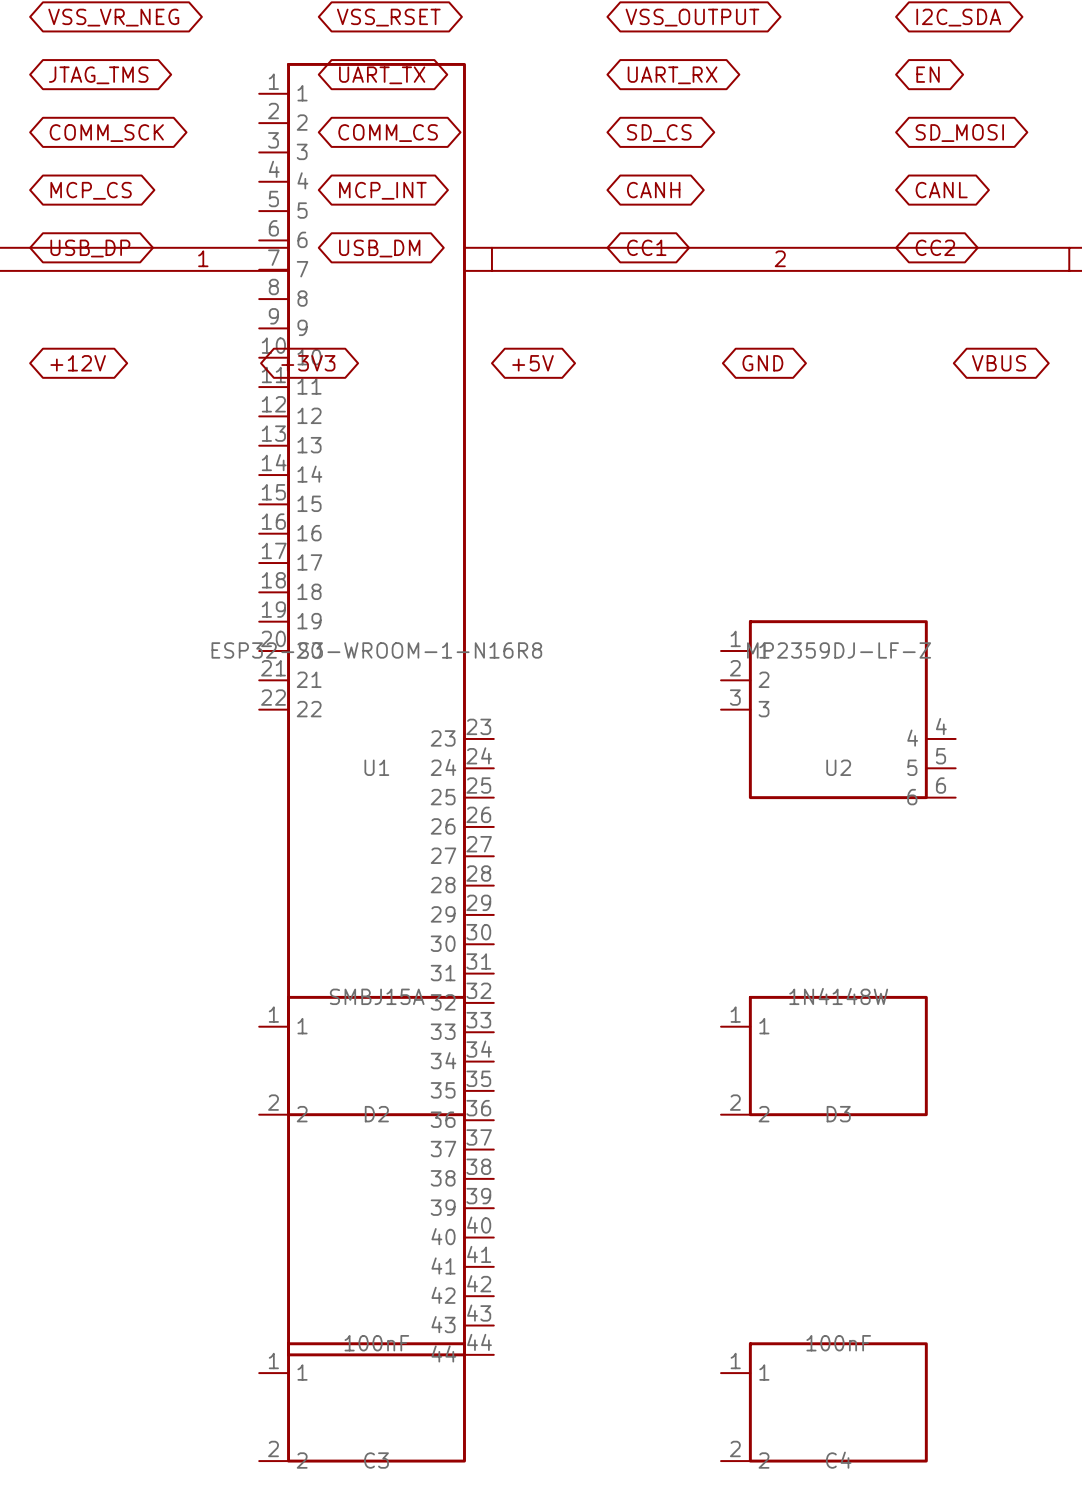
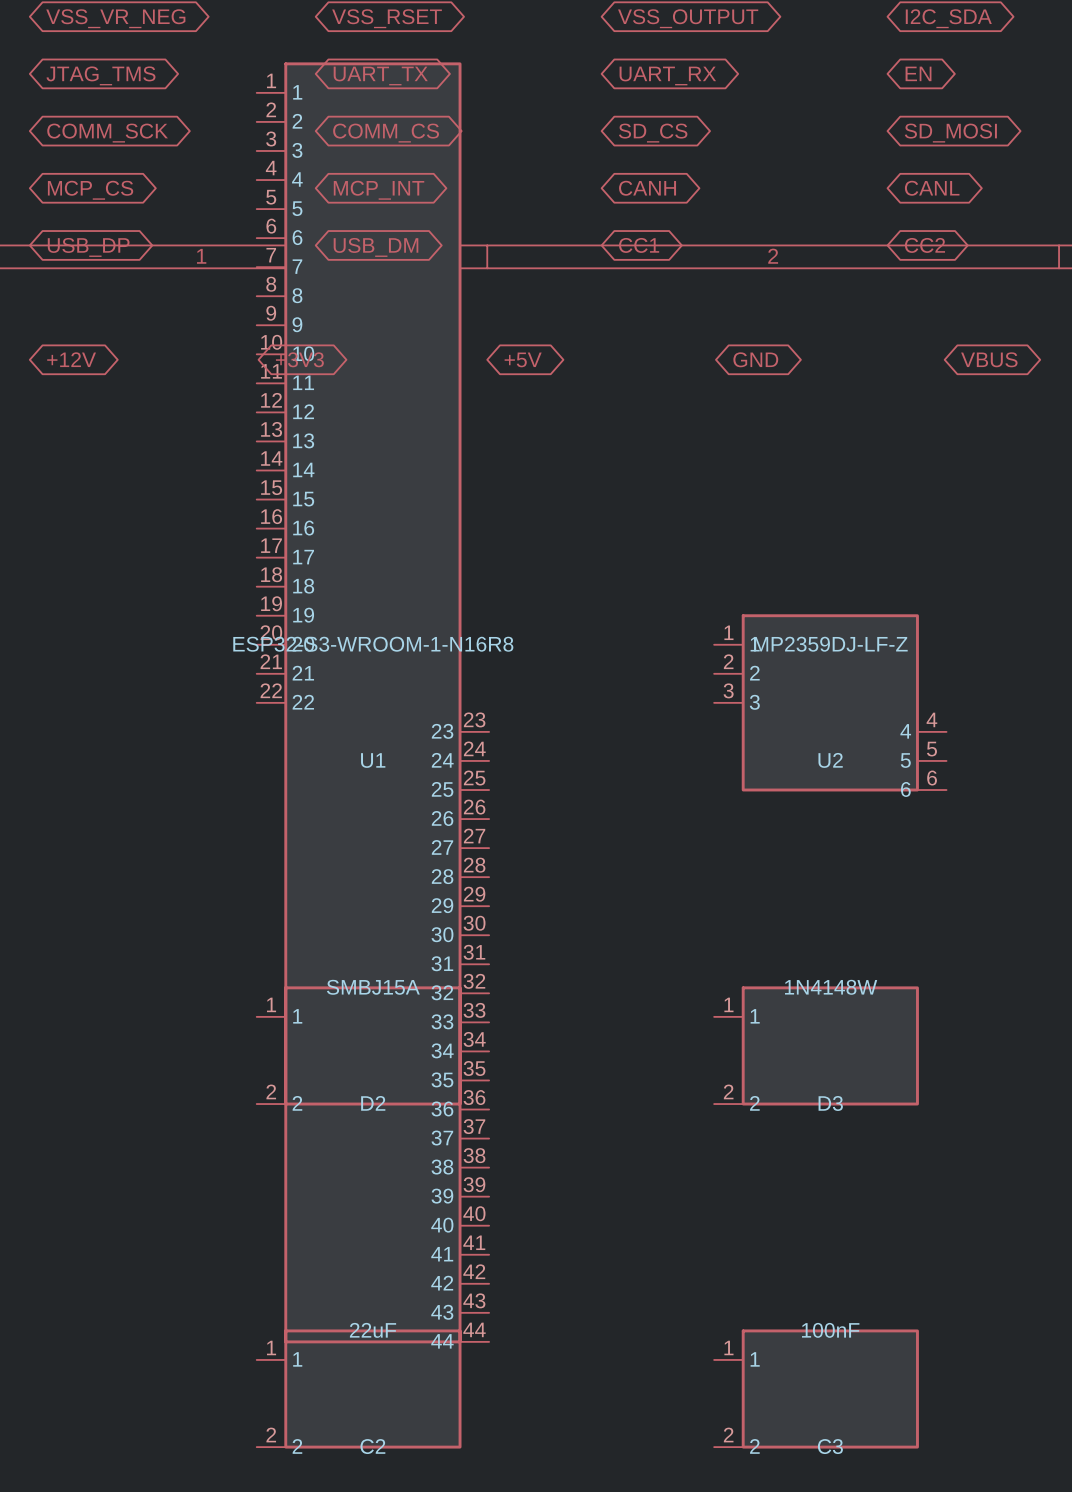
C3 value: 100nF (376, 1343) -> 22uF (373, 1330)
C3 name: C3 (376, 1460) -> C2 (372, 1446)
C4 name: C4 (838, 1460) -> C3 (830, 1446)

